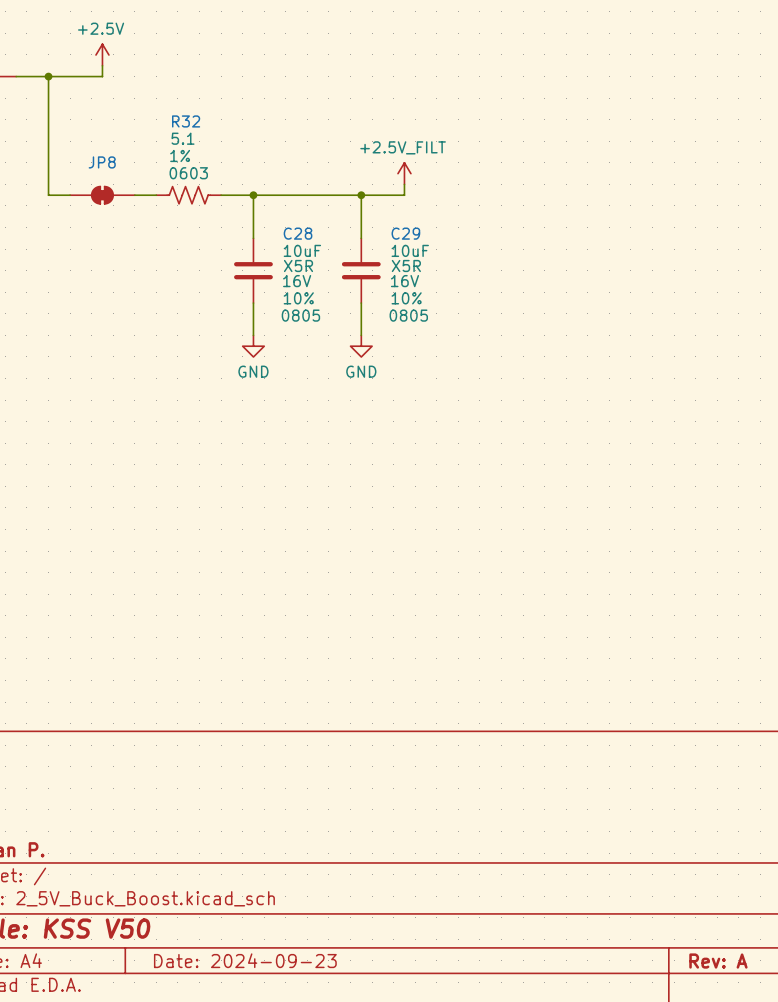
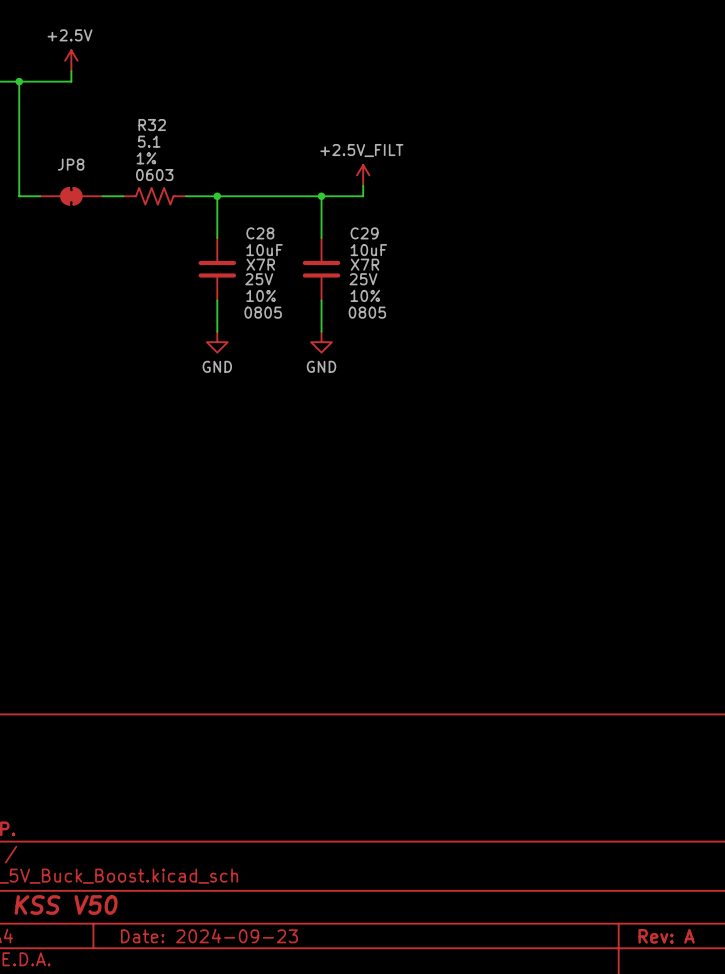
C28 text: X5R (298, 265) -> X7R (260, 264)
C29 text: X5R (406, 265) -> X7R (365, 264)
C28 text: 16V (297, 281) -> 25V (259, 279)
C29 text: 16V (404, 281) -> 25V (363, 279)

